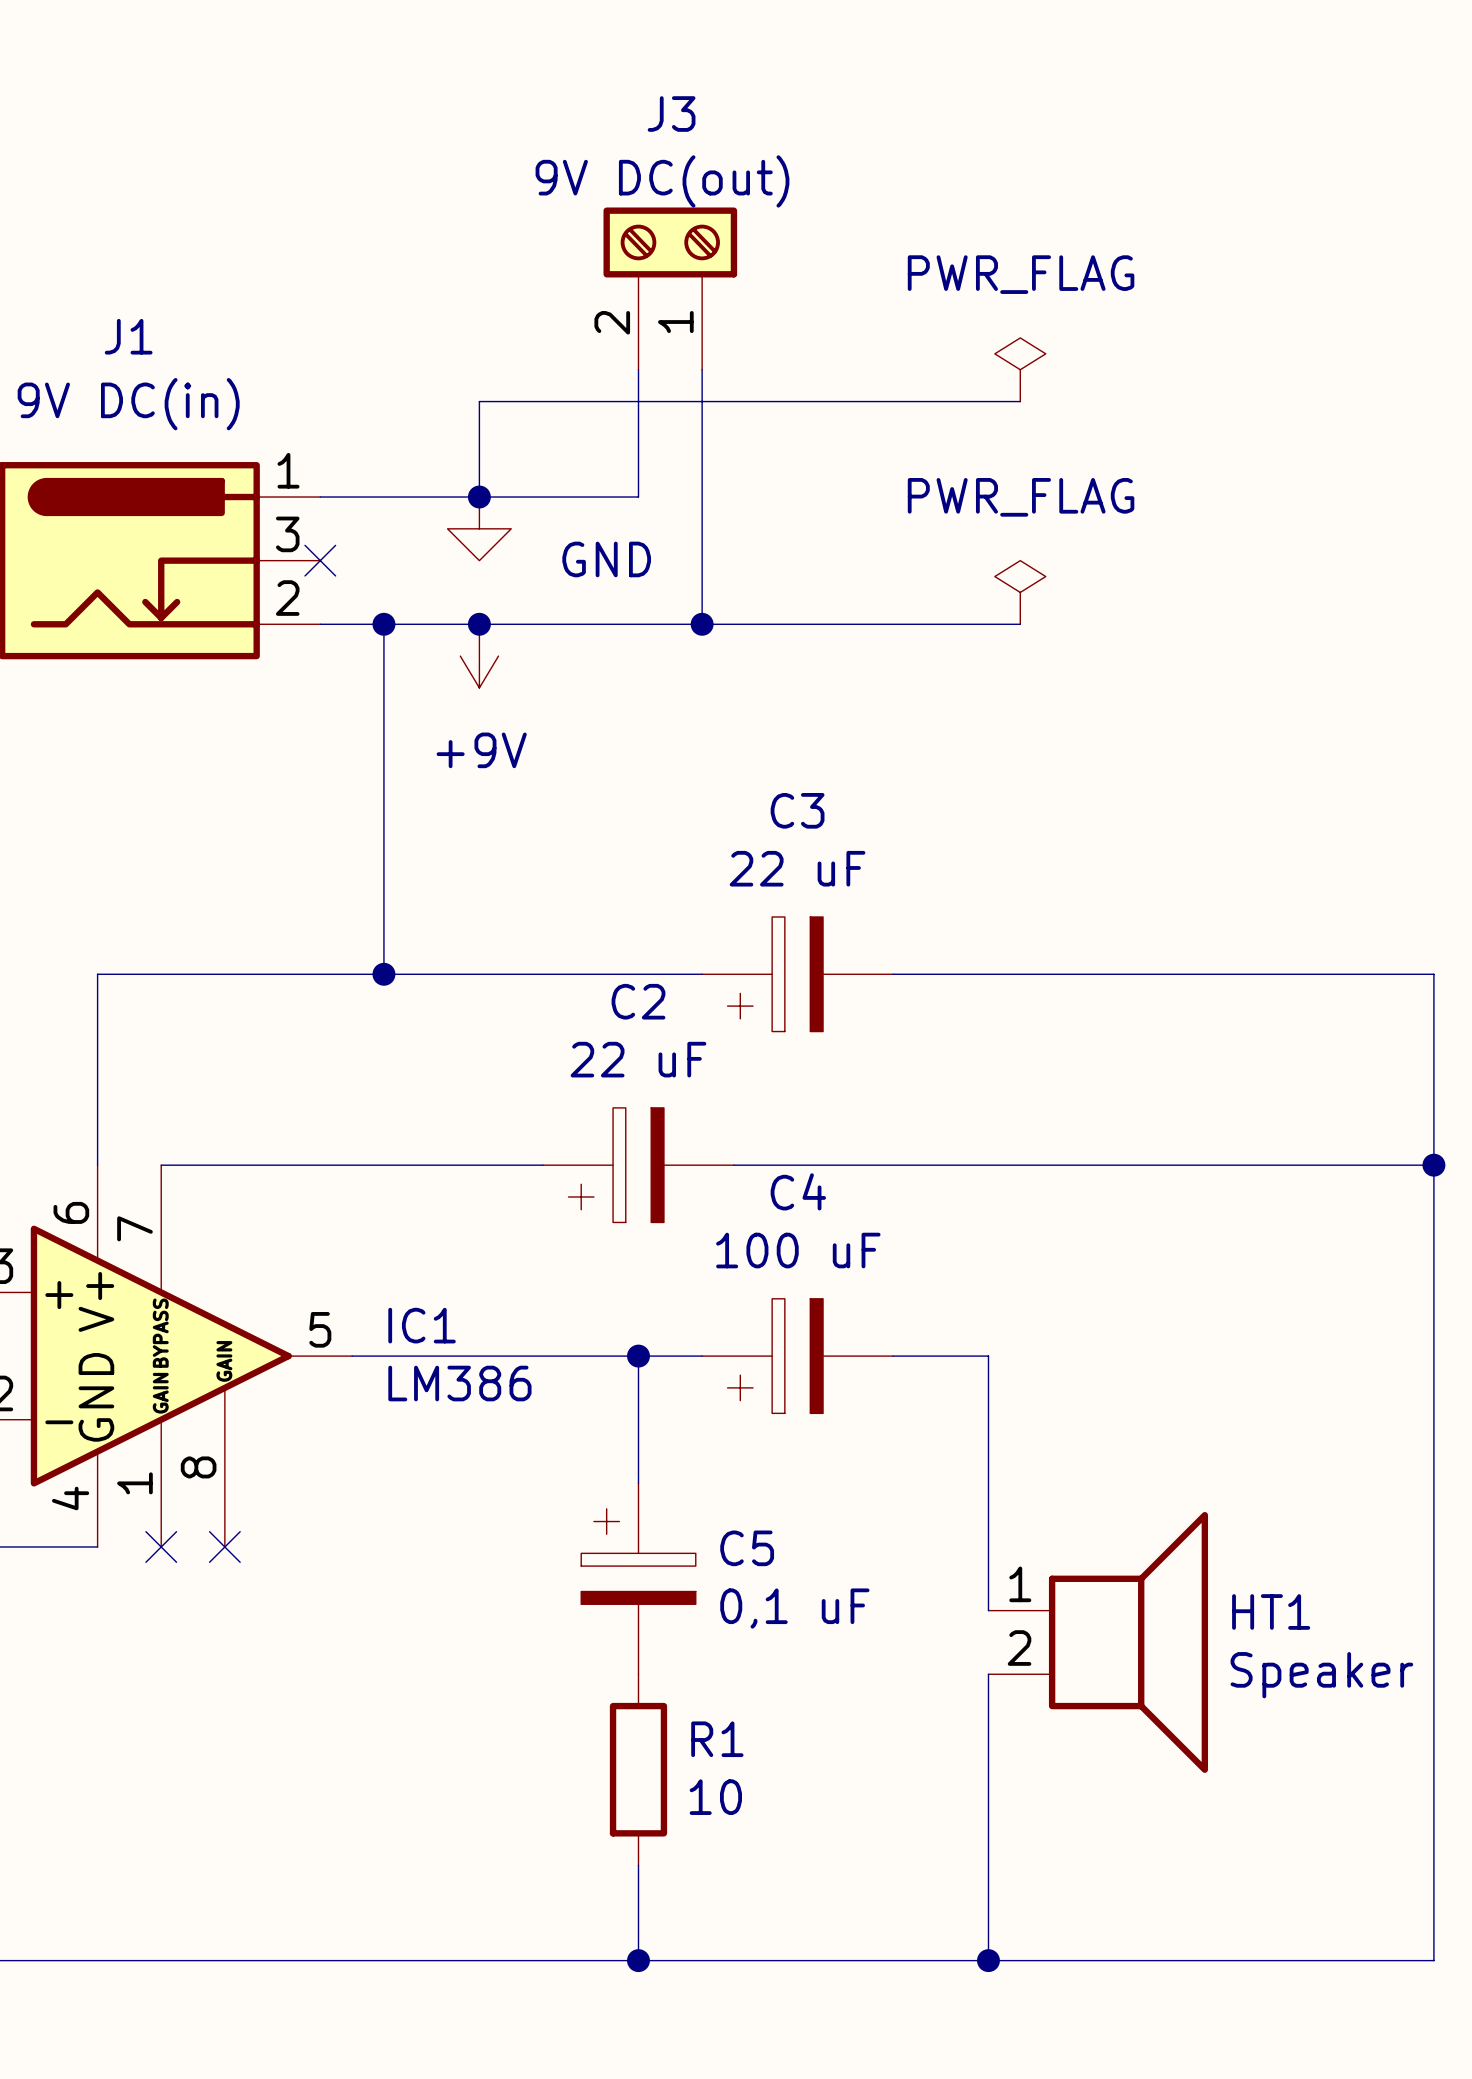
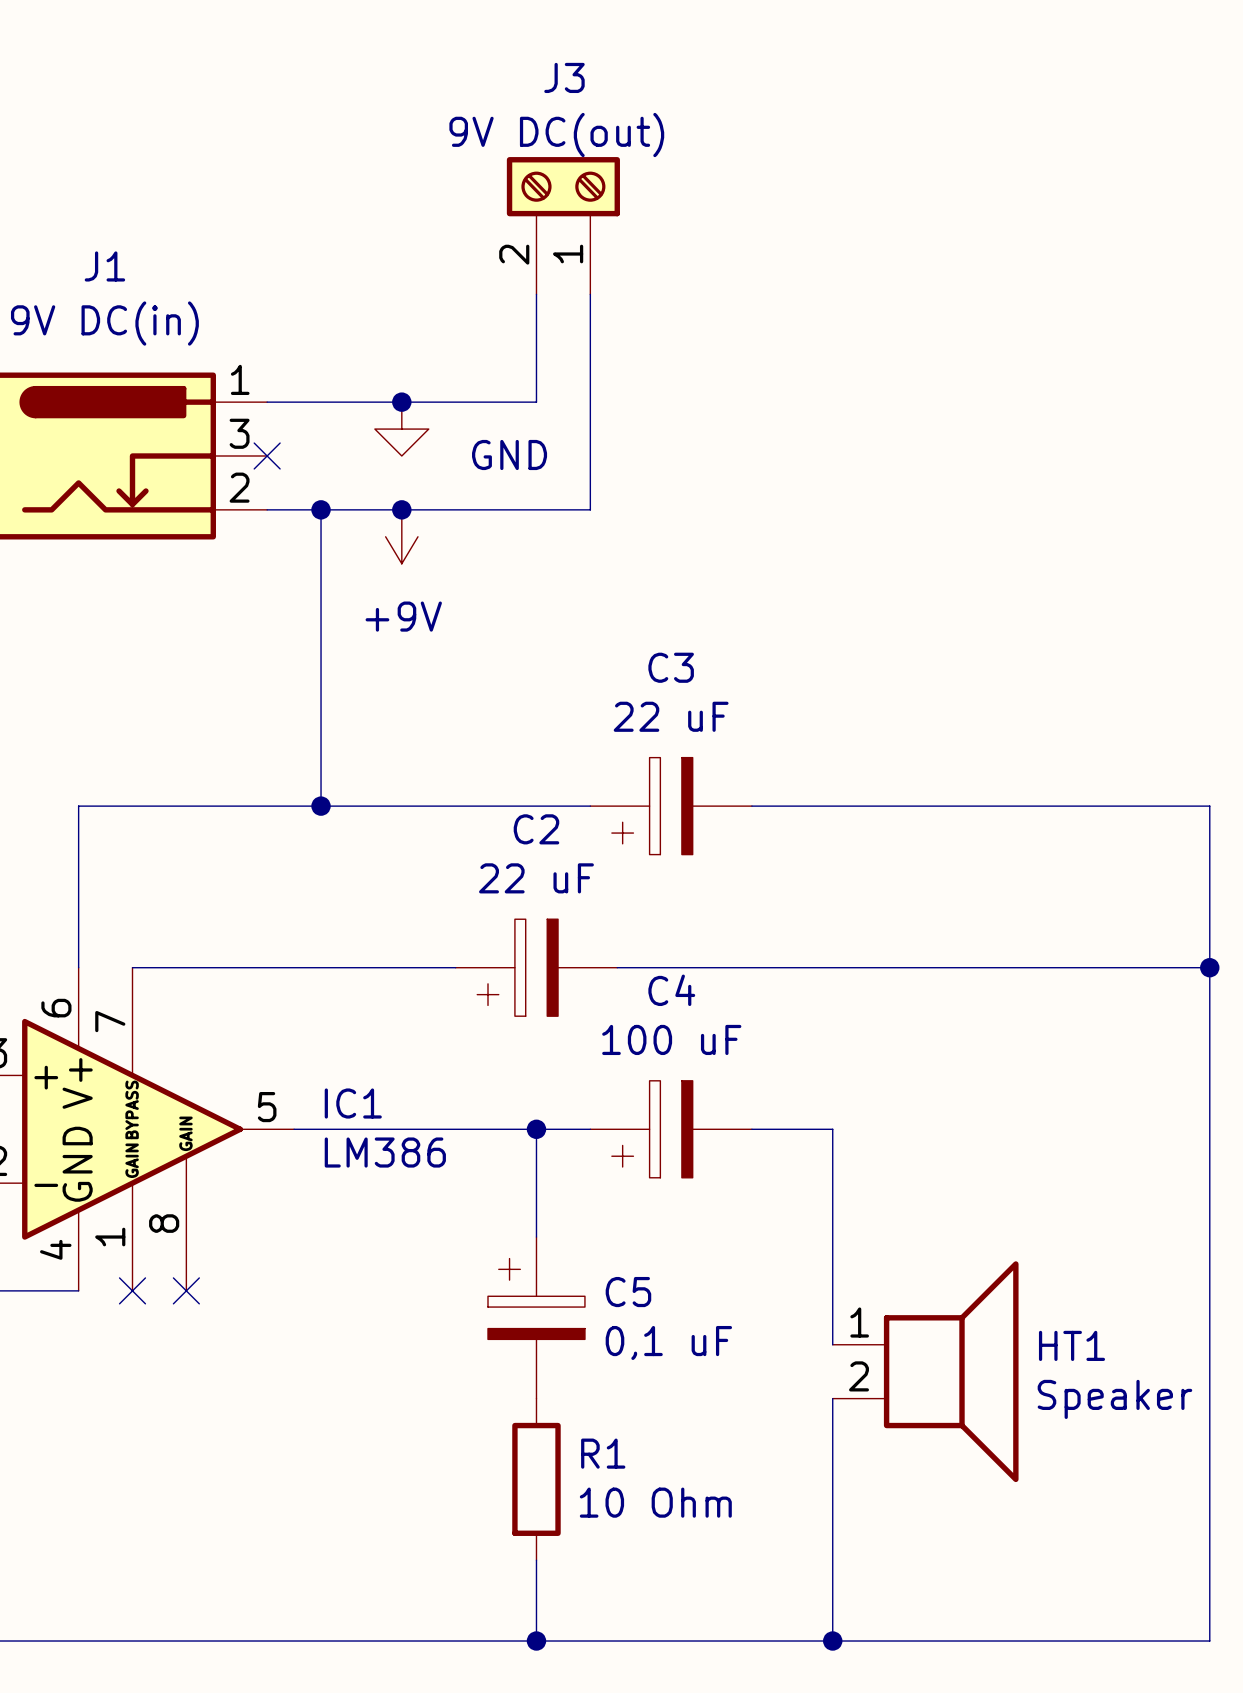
power symbol: PWR_FLAG (1020, 369) -> none
wire: (1020, 401) (479, 401) (479, 497) -> none
power symbol: PWR_FLAG (1020, 592) -> none
wire: (702, 624) (1020, 624) -> none
junction: (702, 624) -> none
R1 value: 10 (715, 1797) -> 10 Ohm (655, 1502)

